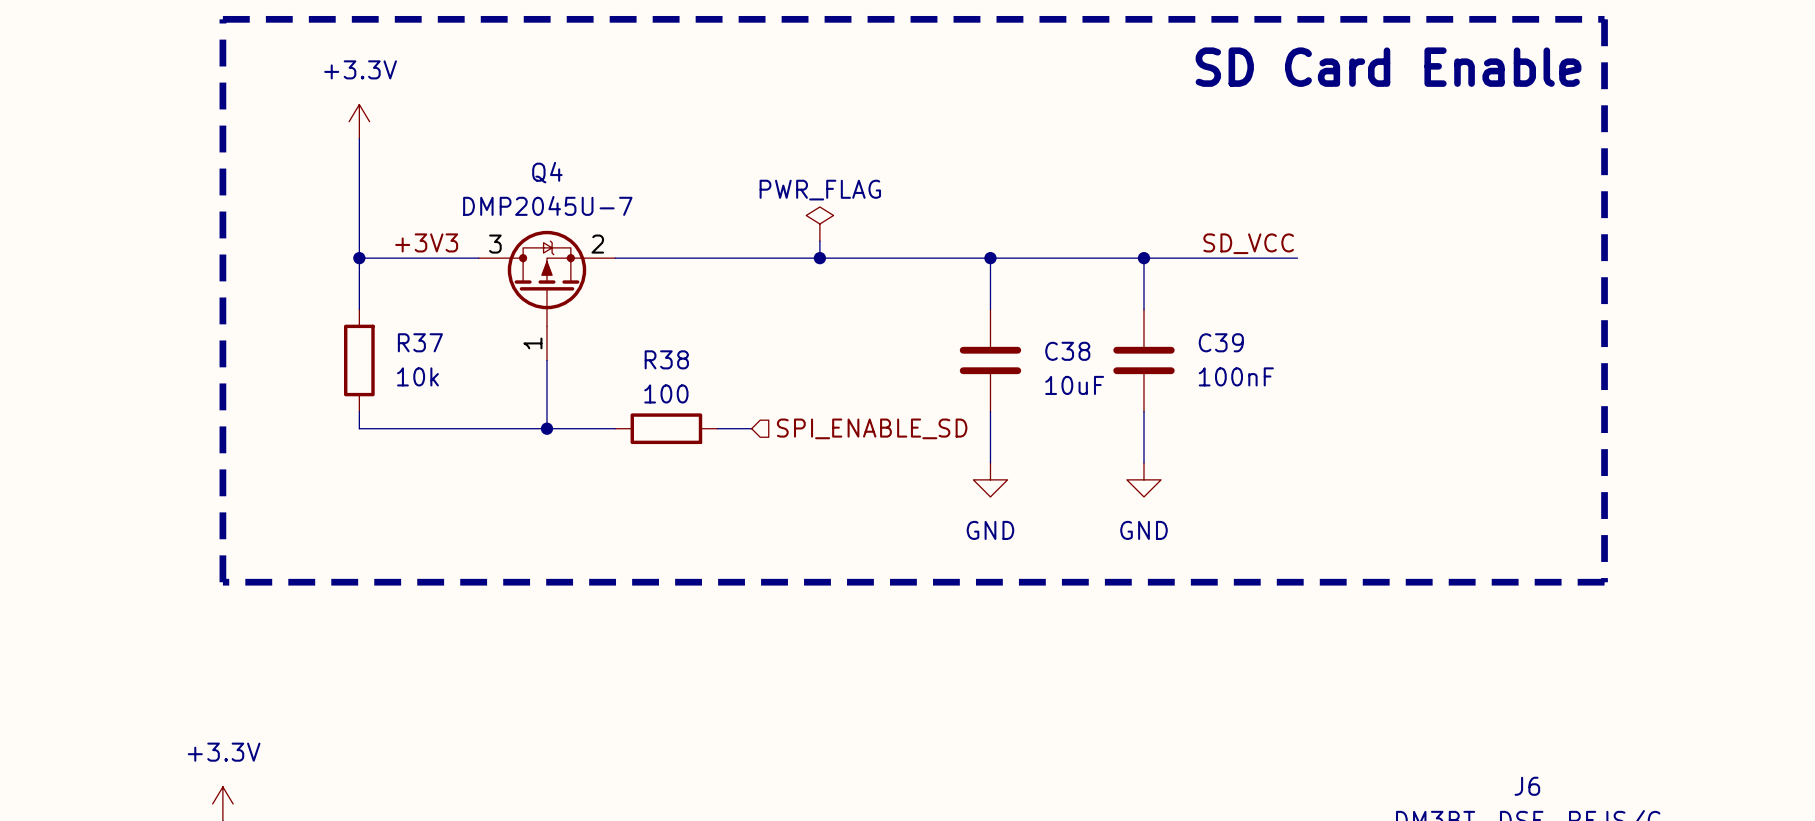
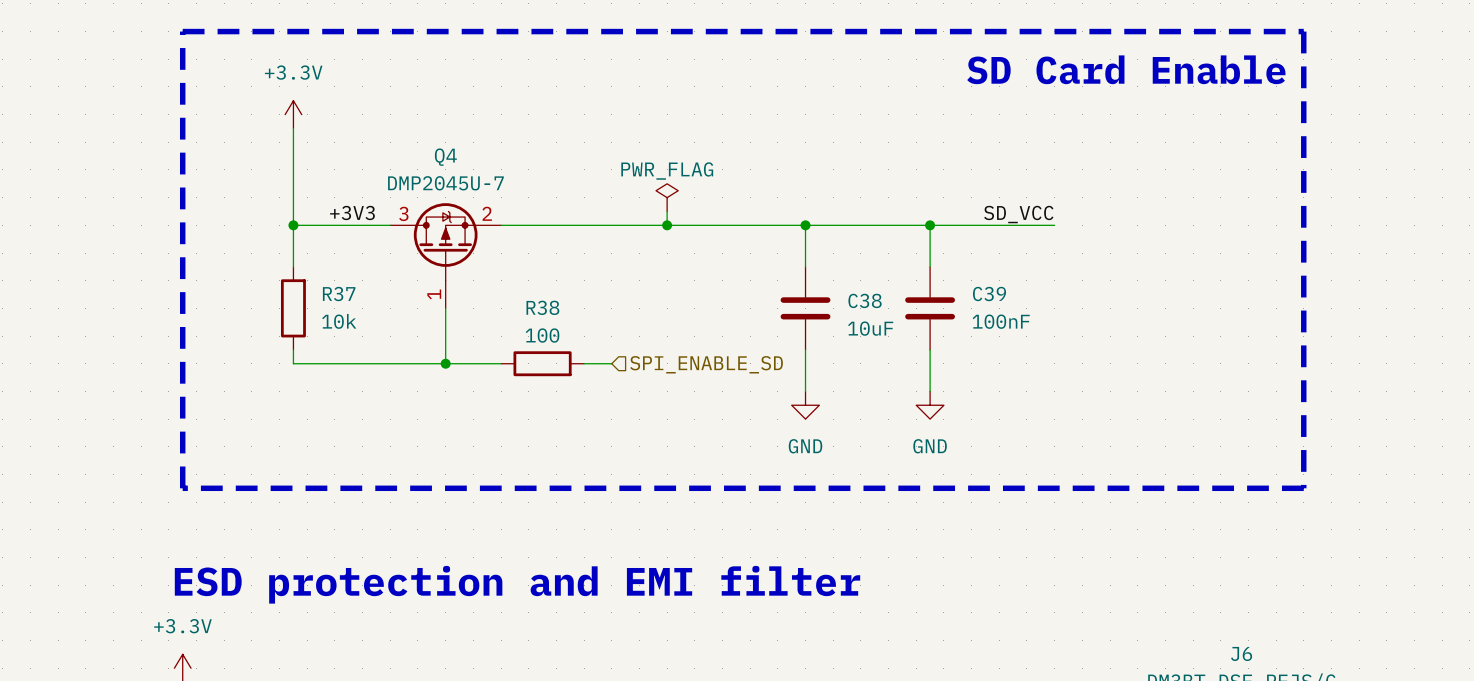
text: none -> ESD protection and EMI filter (517, 584)

